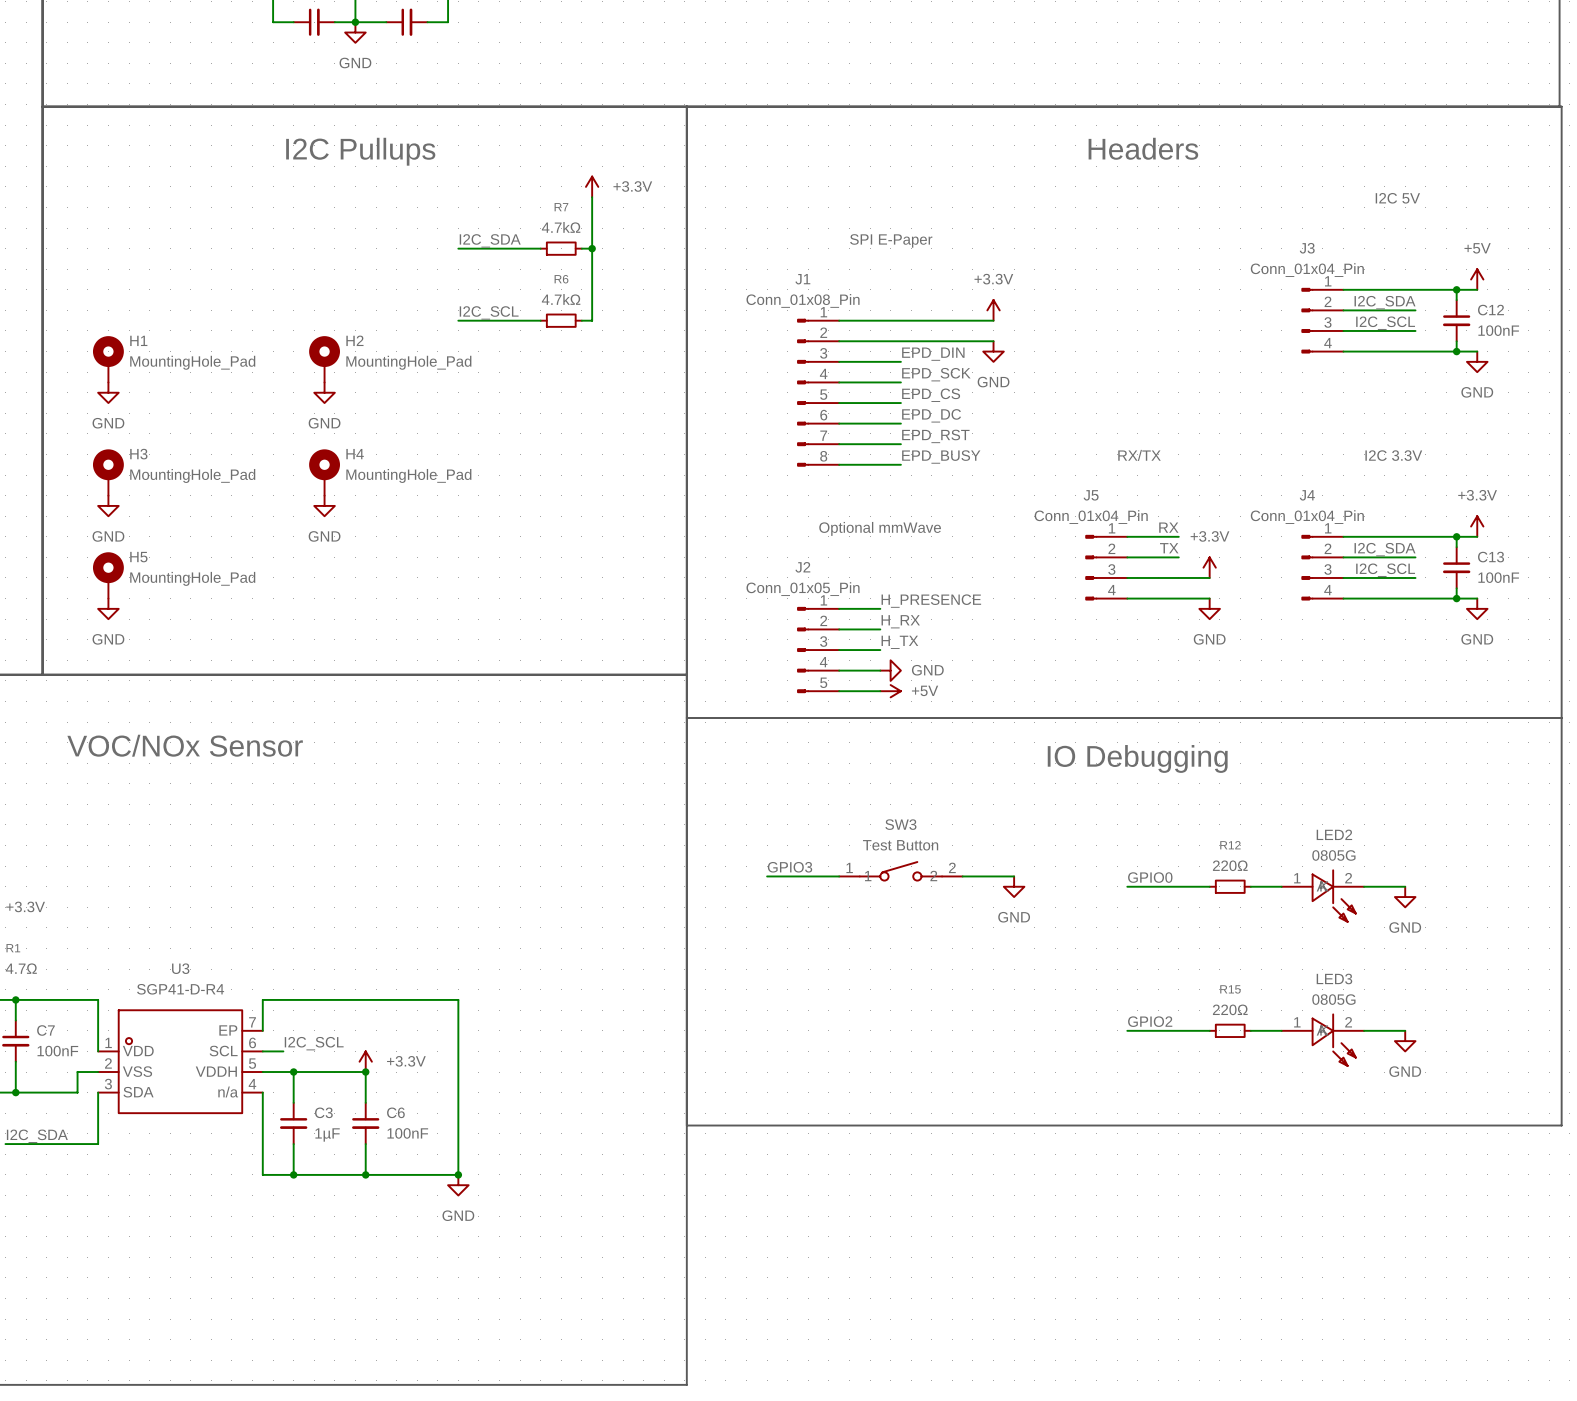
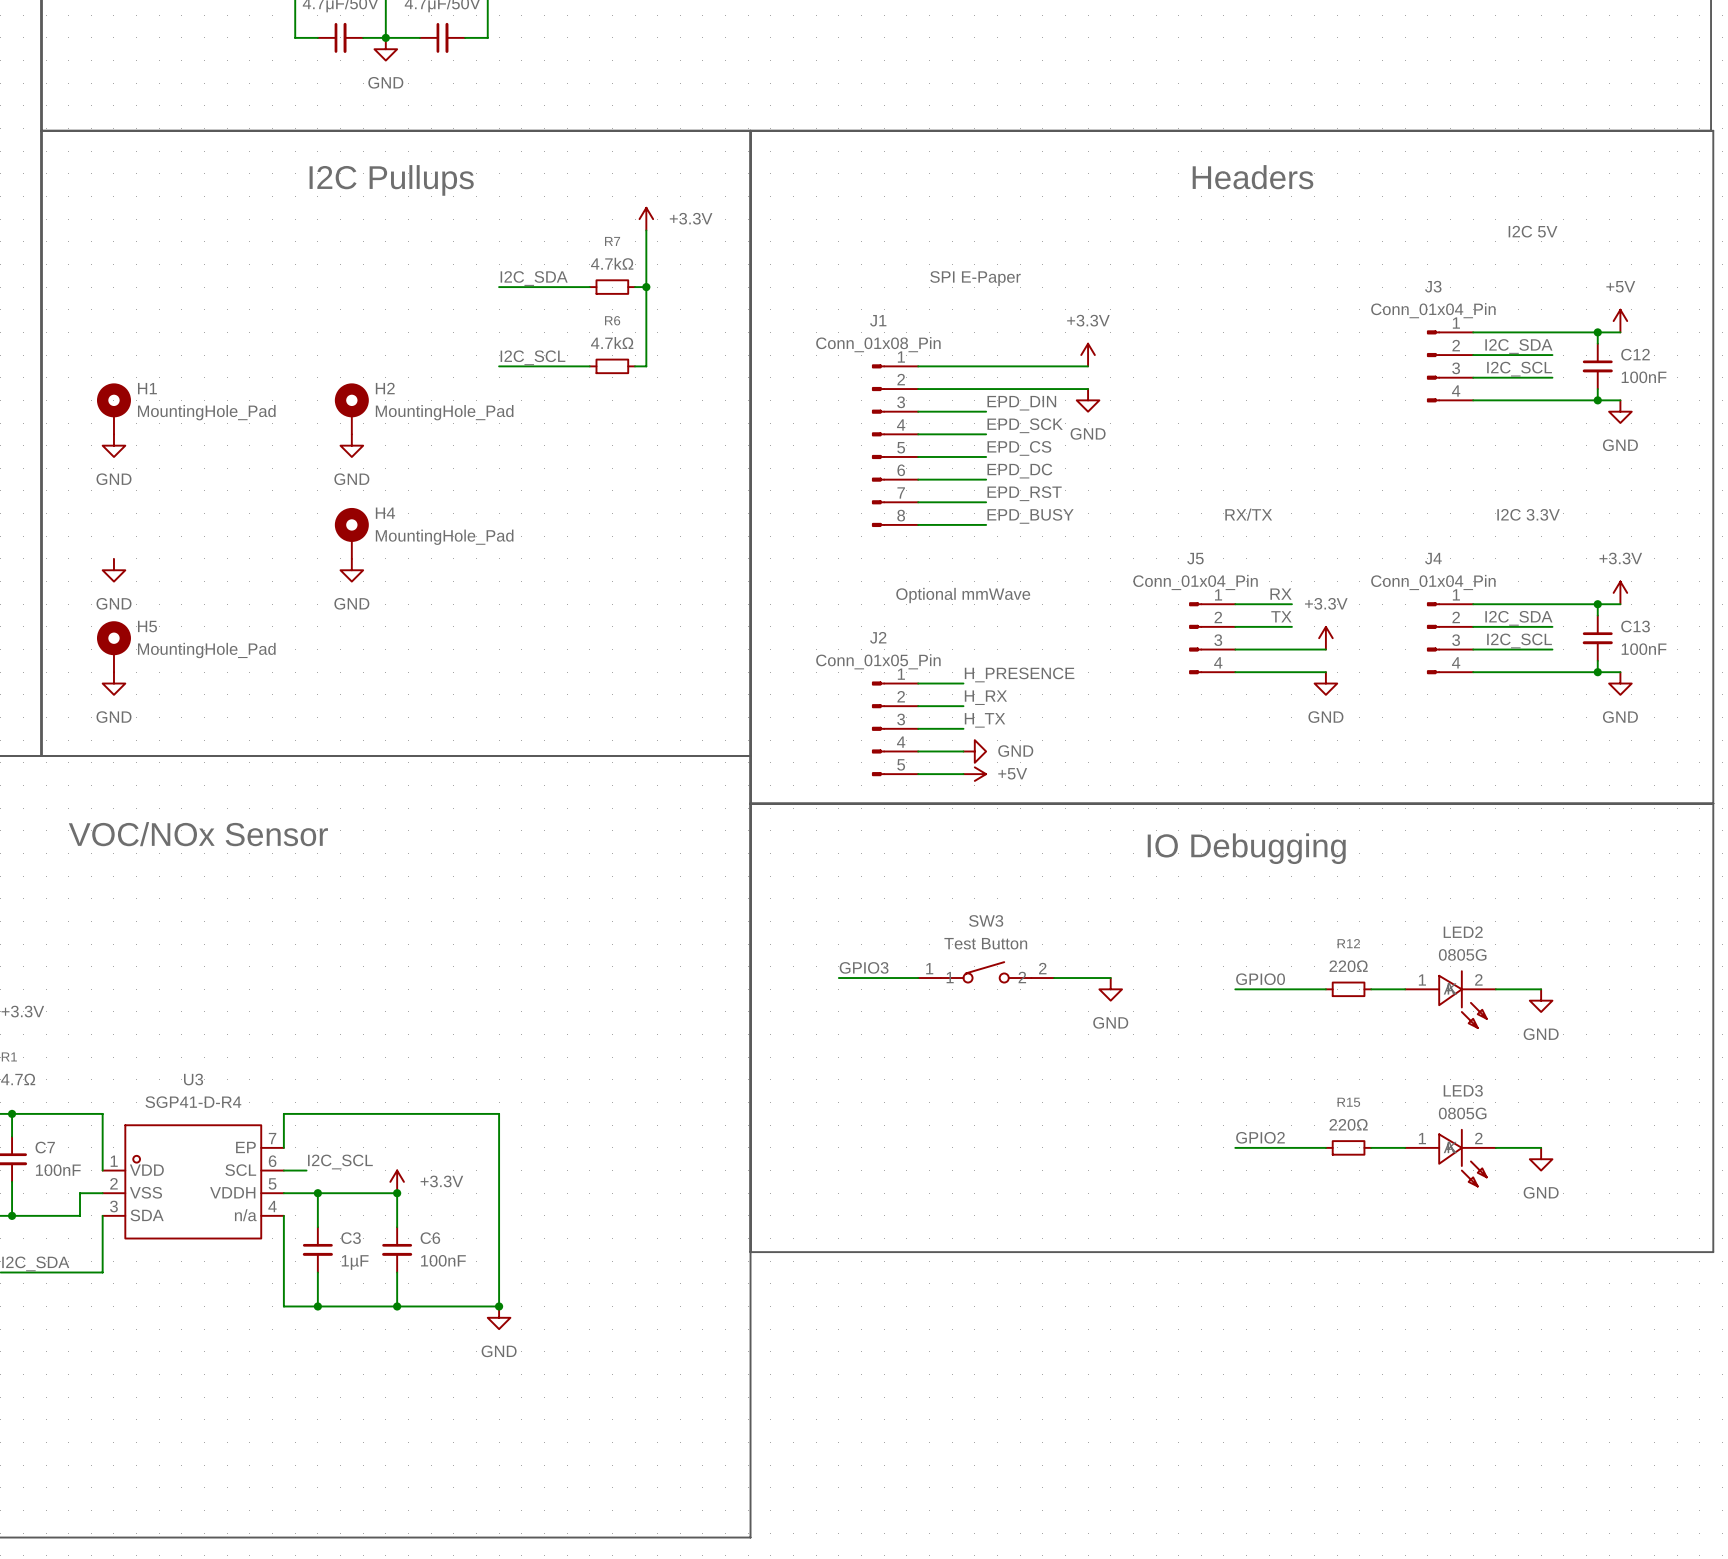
H3: MountingHole_Pad (108, 472) -> none

